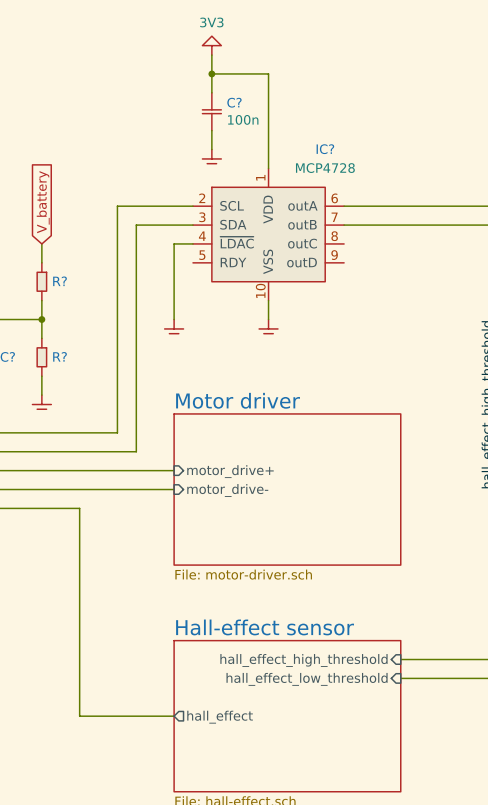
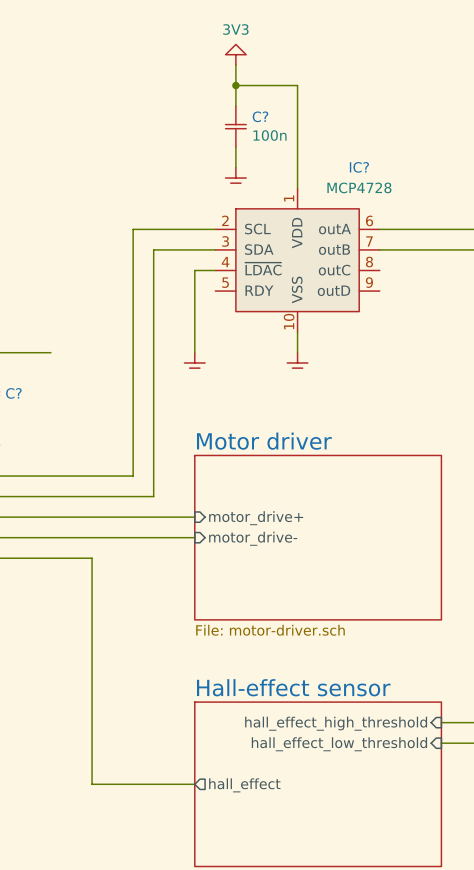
global label: V_battery (43, 202) -> none
wire: (41, 243) (41, 262) -> none
R?: (41, 281) -> none
wire: (41, 300) (41, 338) -> none
junction: (41, 319) -> none
R?: (41, 357) -> none
wire: (41, 376) (41, 395) -> none
power symbol: (41, 404) -> none

